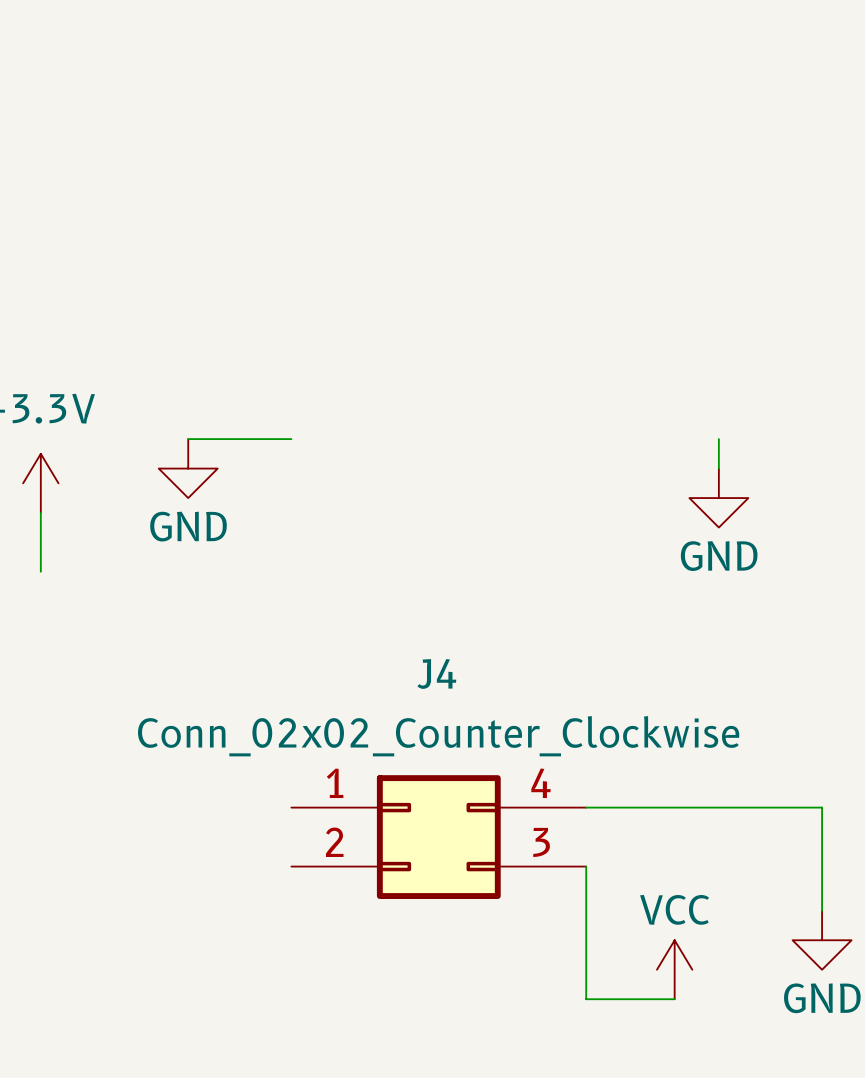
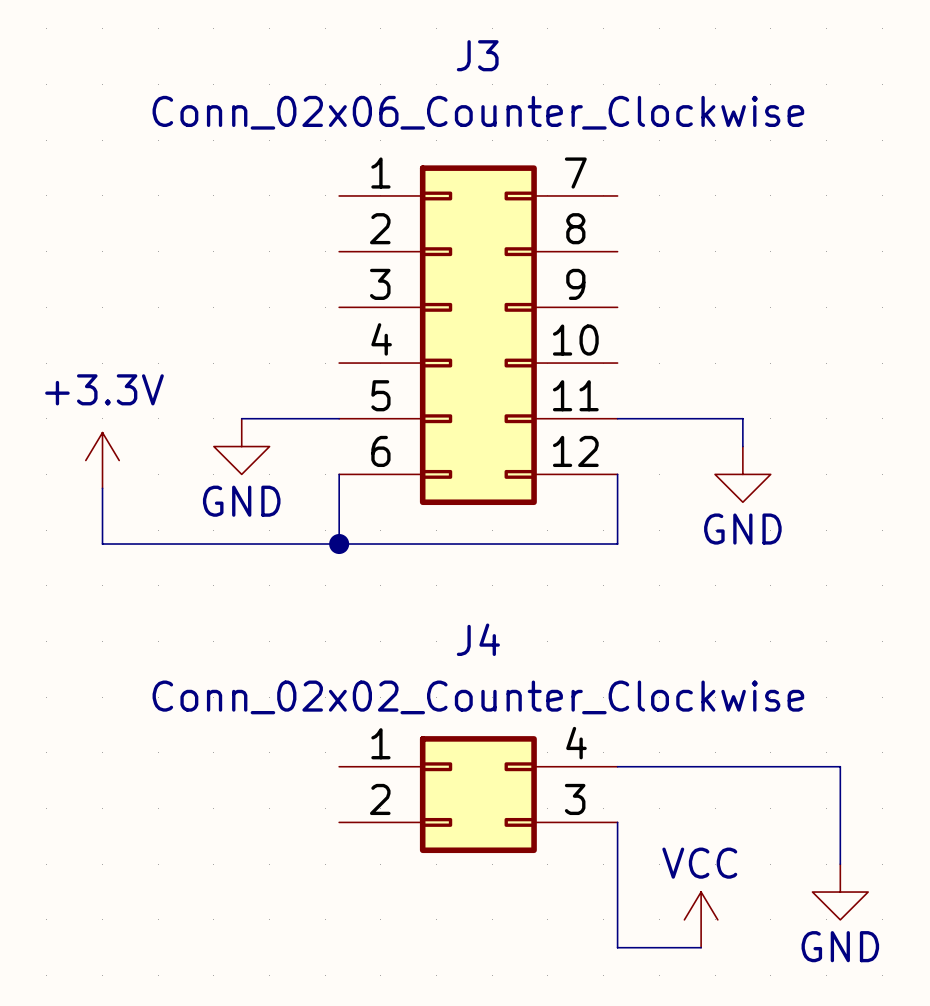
J3: none -> Conn_02x06_Counter_Clockwise (478, 335)
wire: none -> (617, 418) (742, 418)
wire: none -> (339, 474) (339, 544)
wire: none -> (617, 474) (617, 544) (102, 544)
junction: none -> (339, 544)

